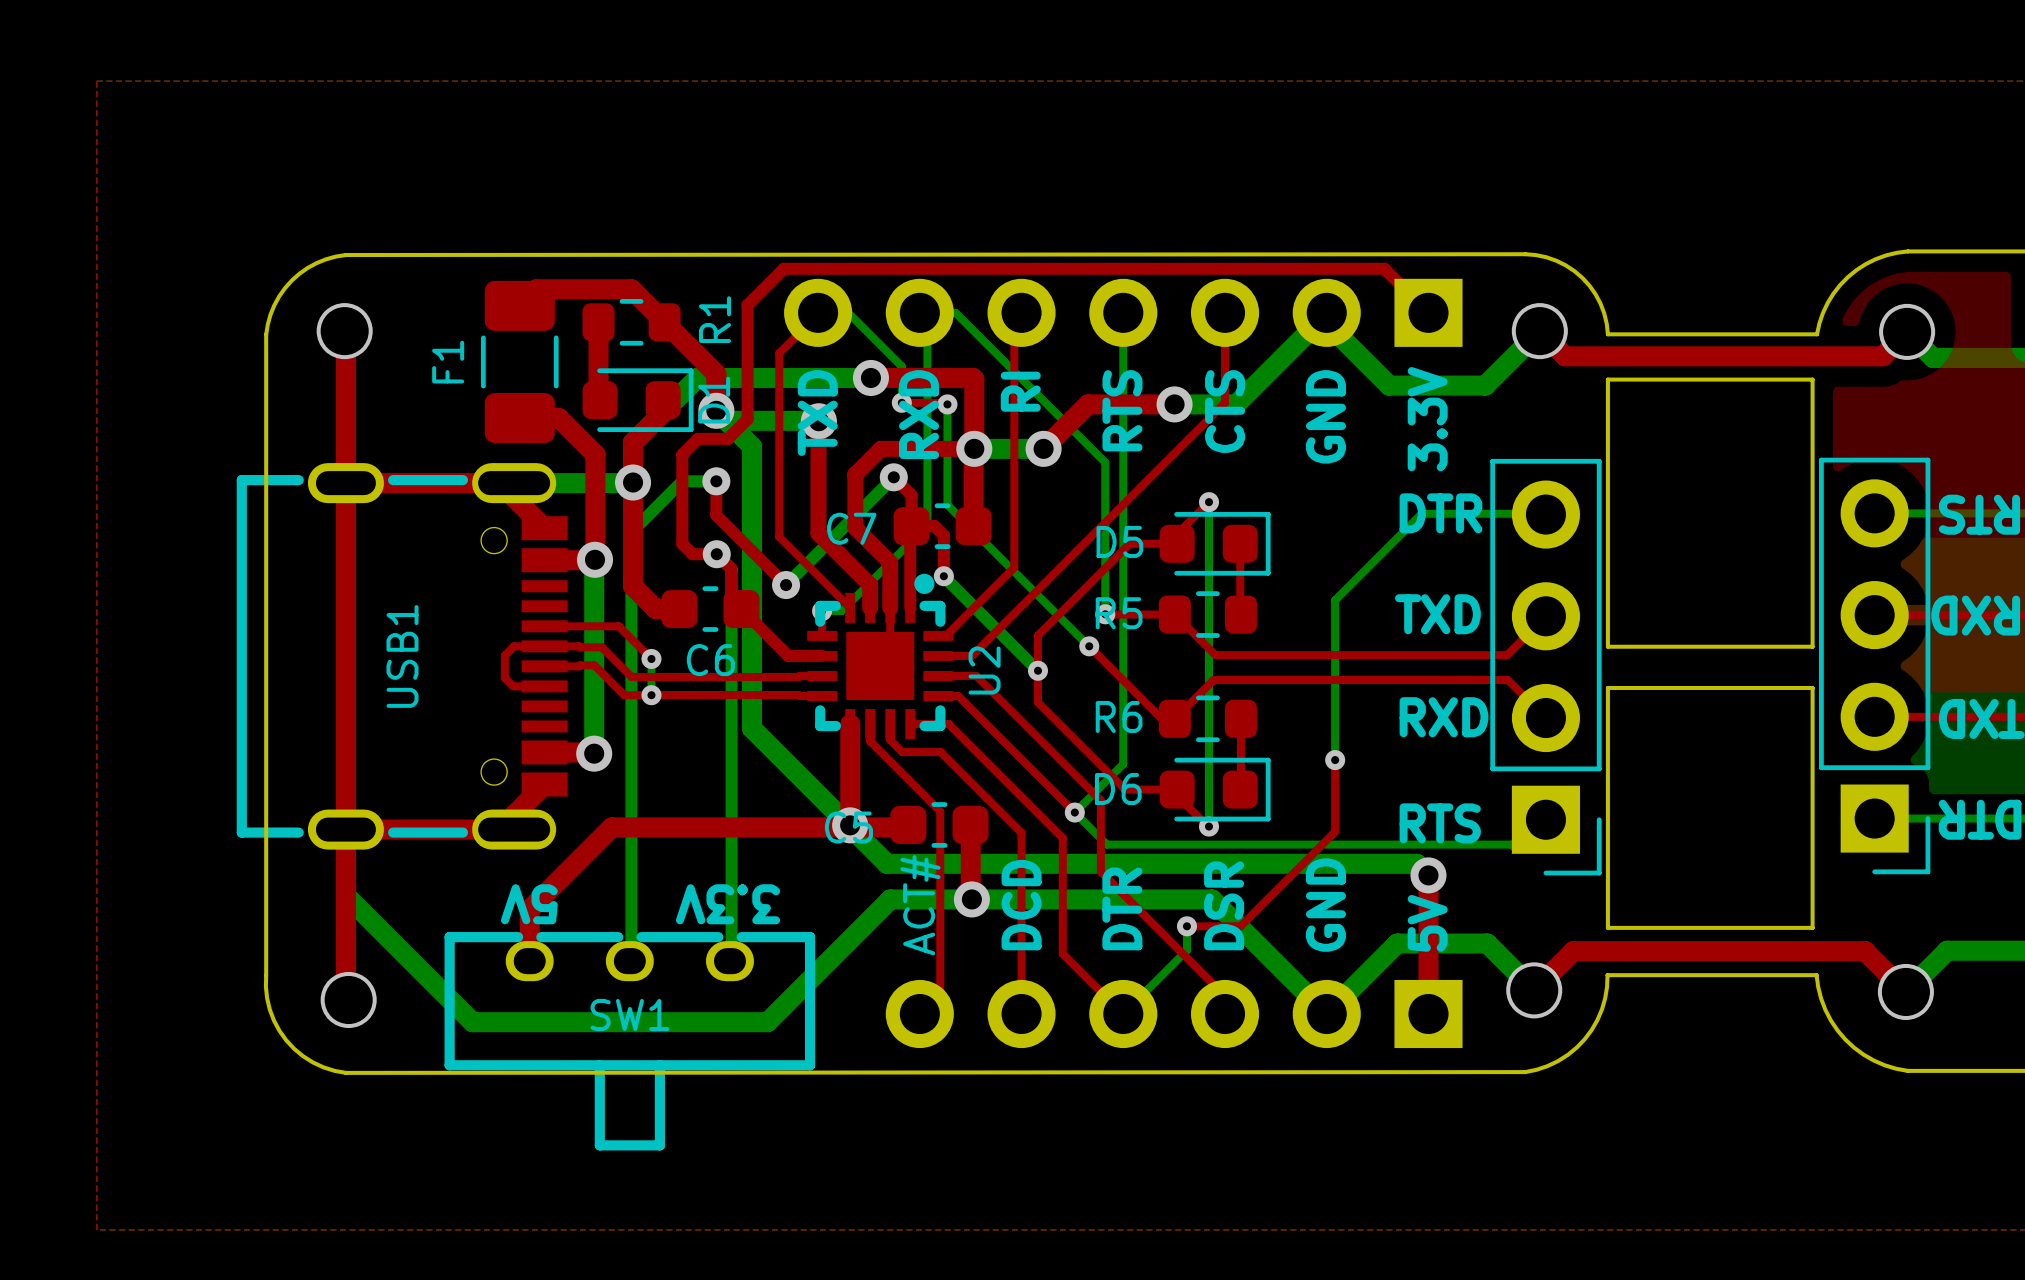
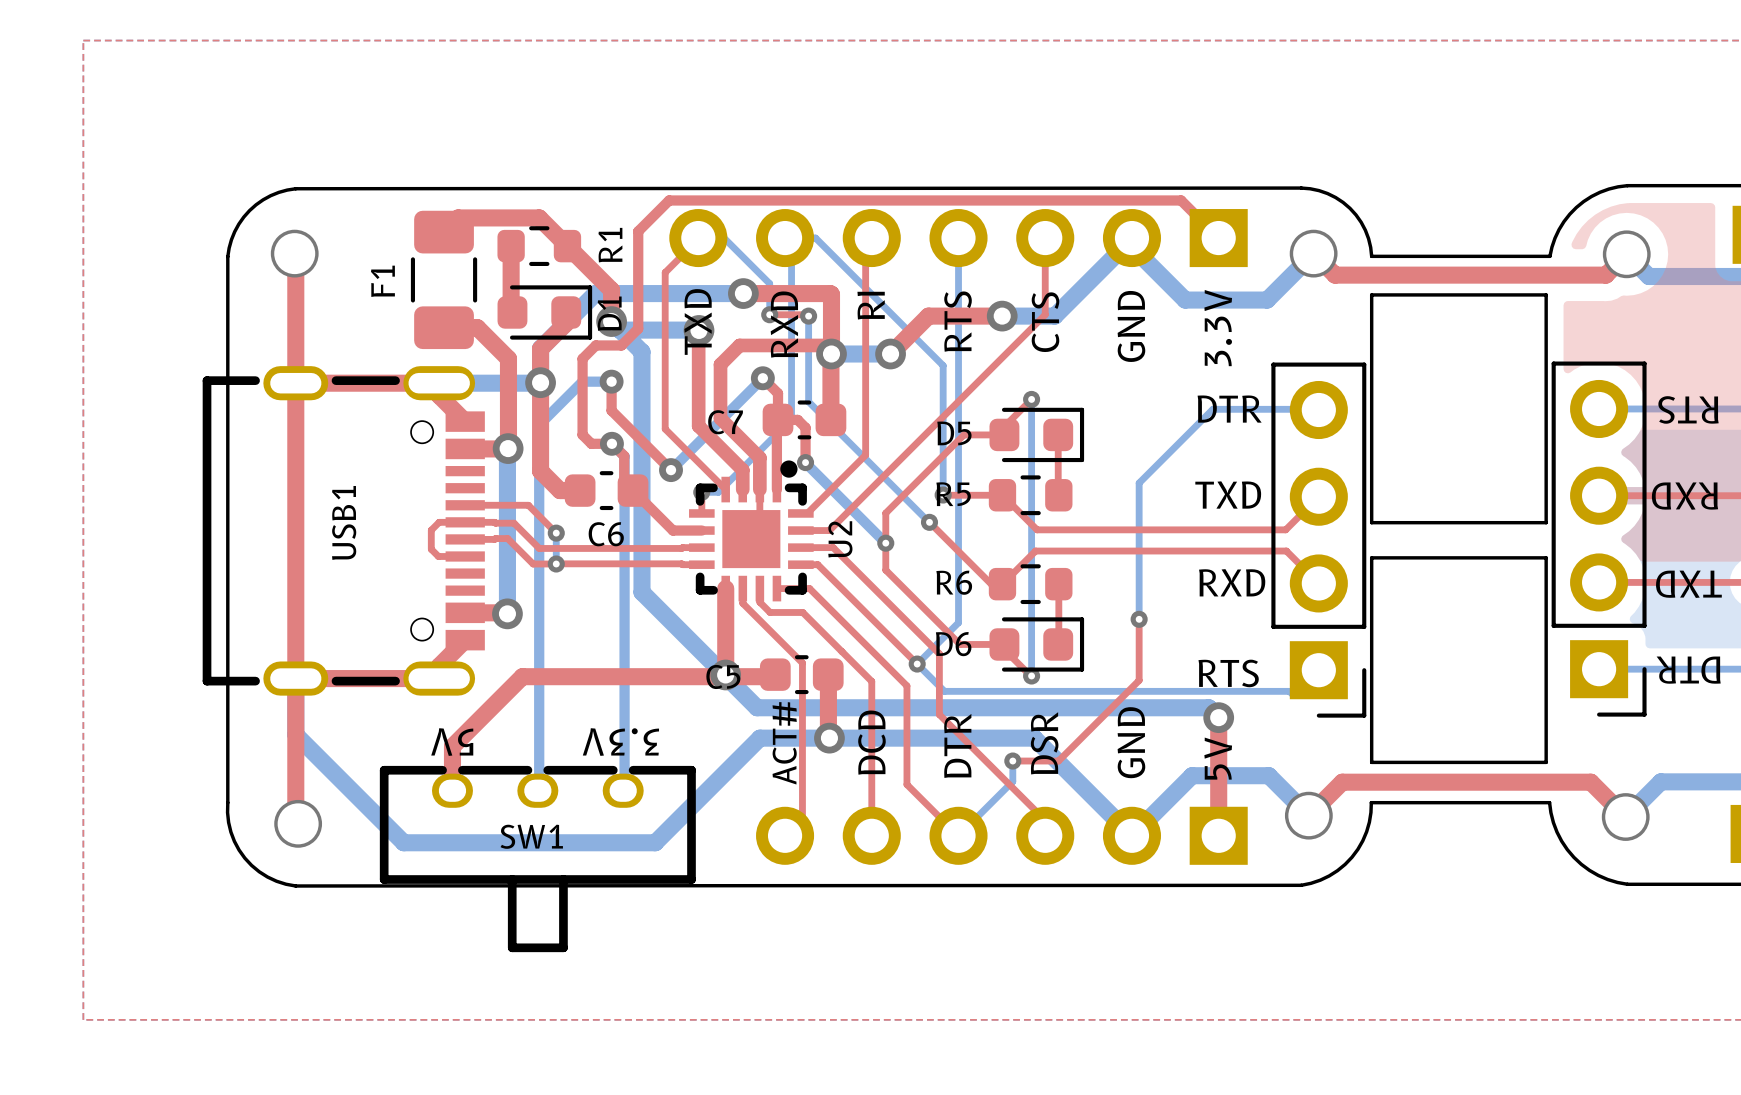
top track: (974, 448) (880, 448) (855, 474) (855, 527) (890, 562) (890, 570) -> (830, 345) (739, 345) (720, 364) (720, 418) (759, 457)

